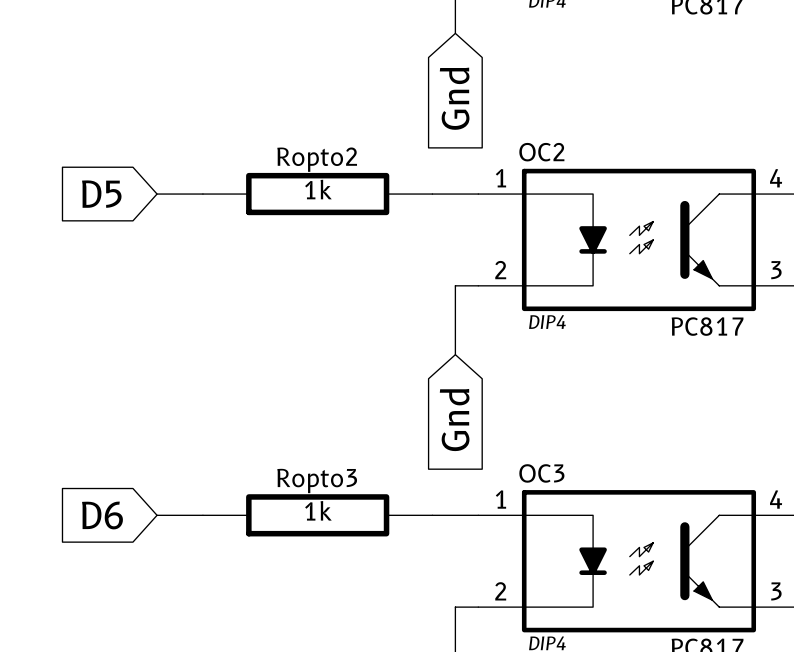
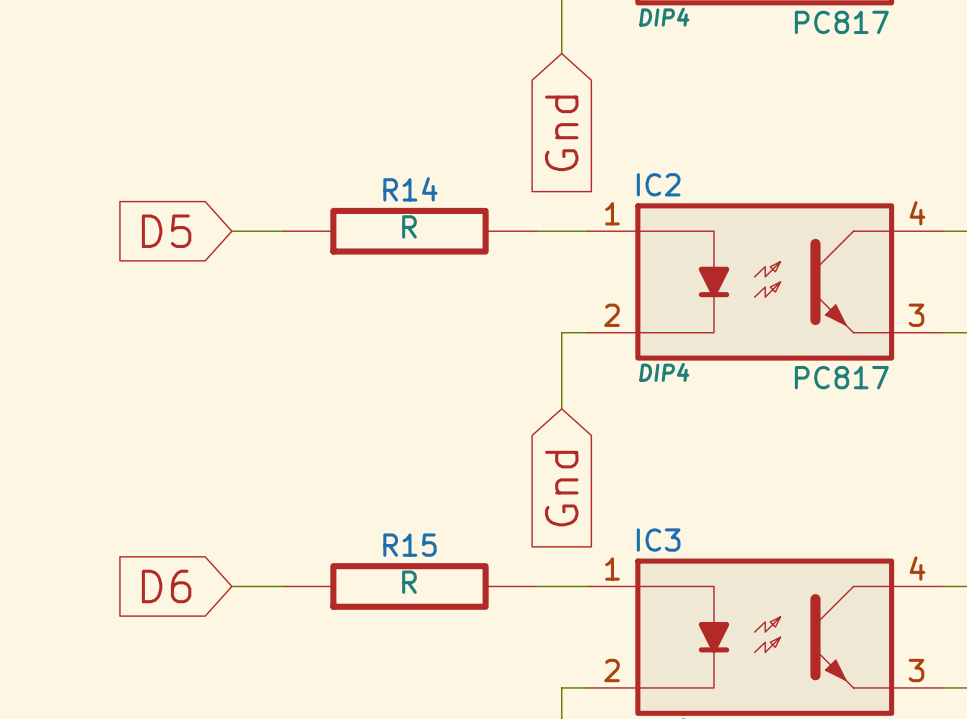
OC2 name: OC2 (541, 152) -> IC2 (658, 184)
Ropto2 name: Ropto2 (317, 159) -> R14 (410, 189)
Ropto2 value: 1k (318, 189) -> R (409, 226)
OC3 name: OC3 (541, 473) -> IC3 (658, 540)
Ropto3 name: Ropto3 (317, 480) -> R15 (409, 545)
Ropto3 value: 1k (318, 510) -> R (409, 582)

